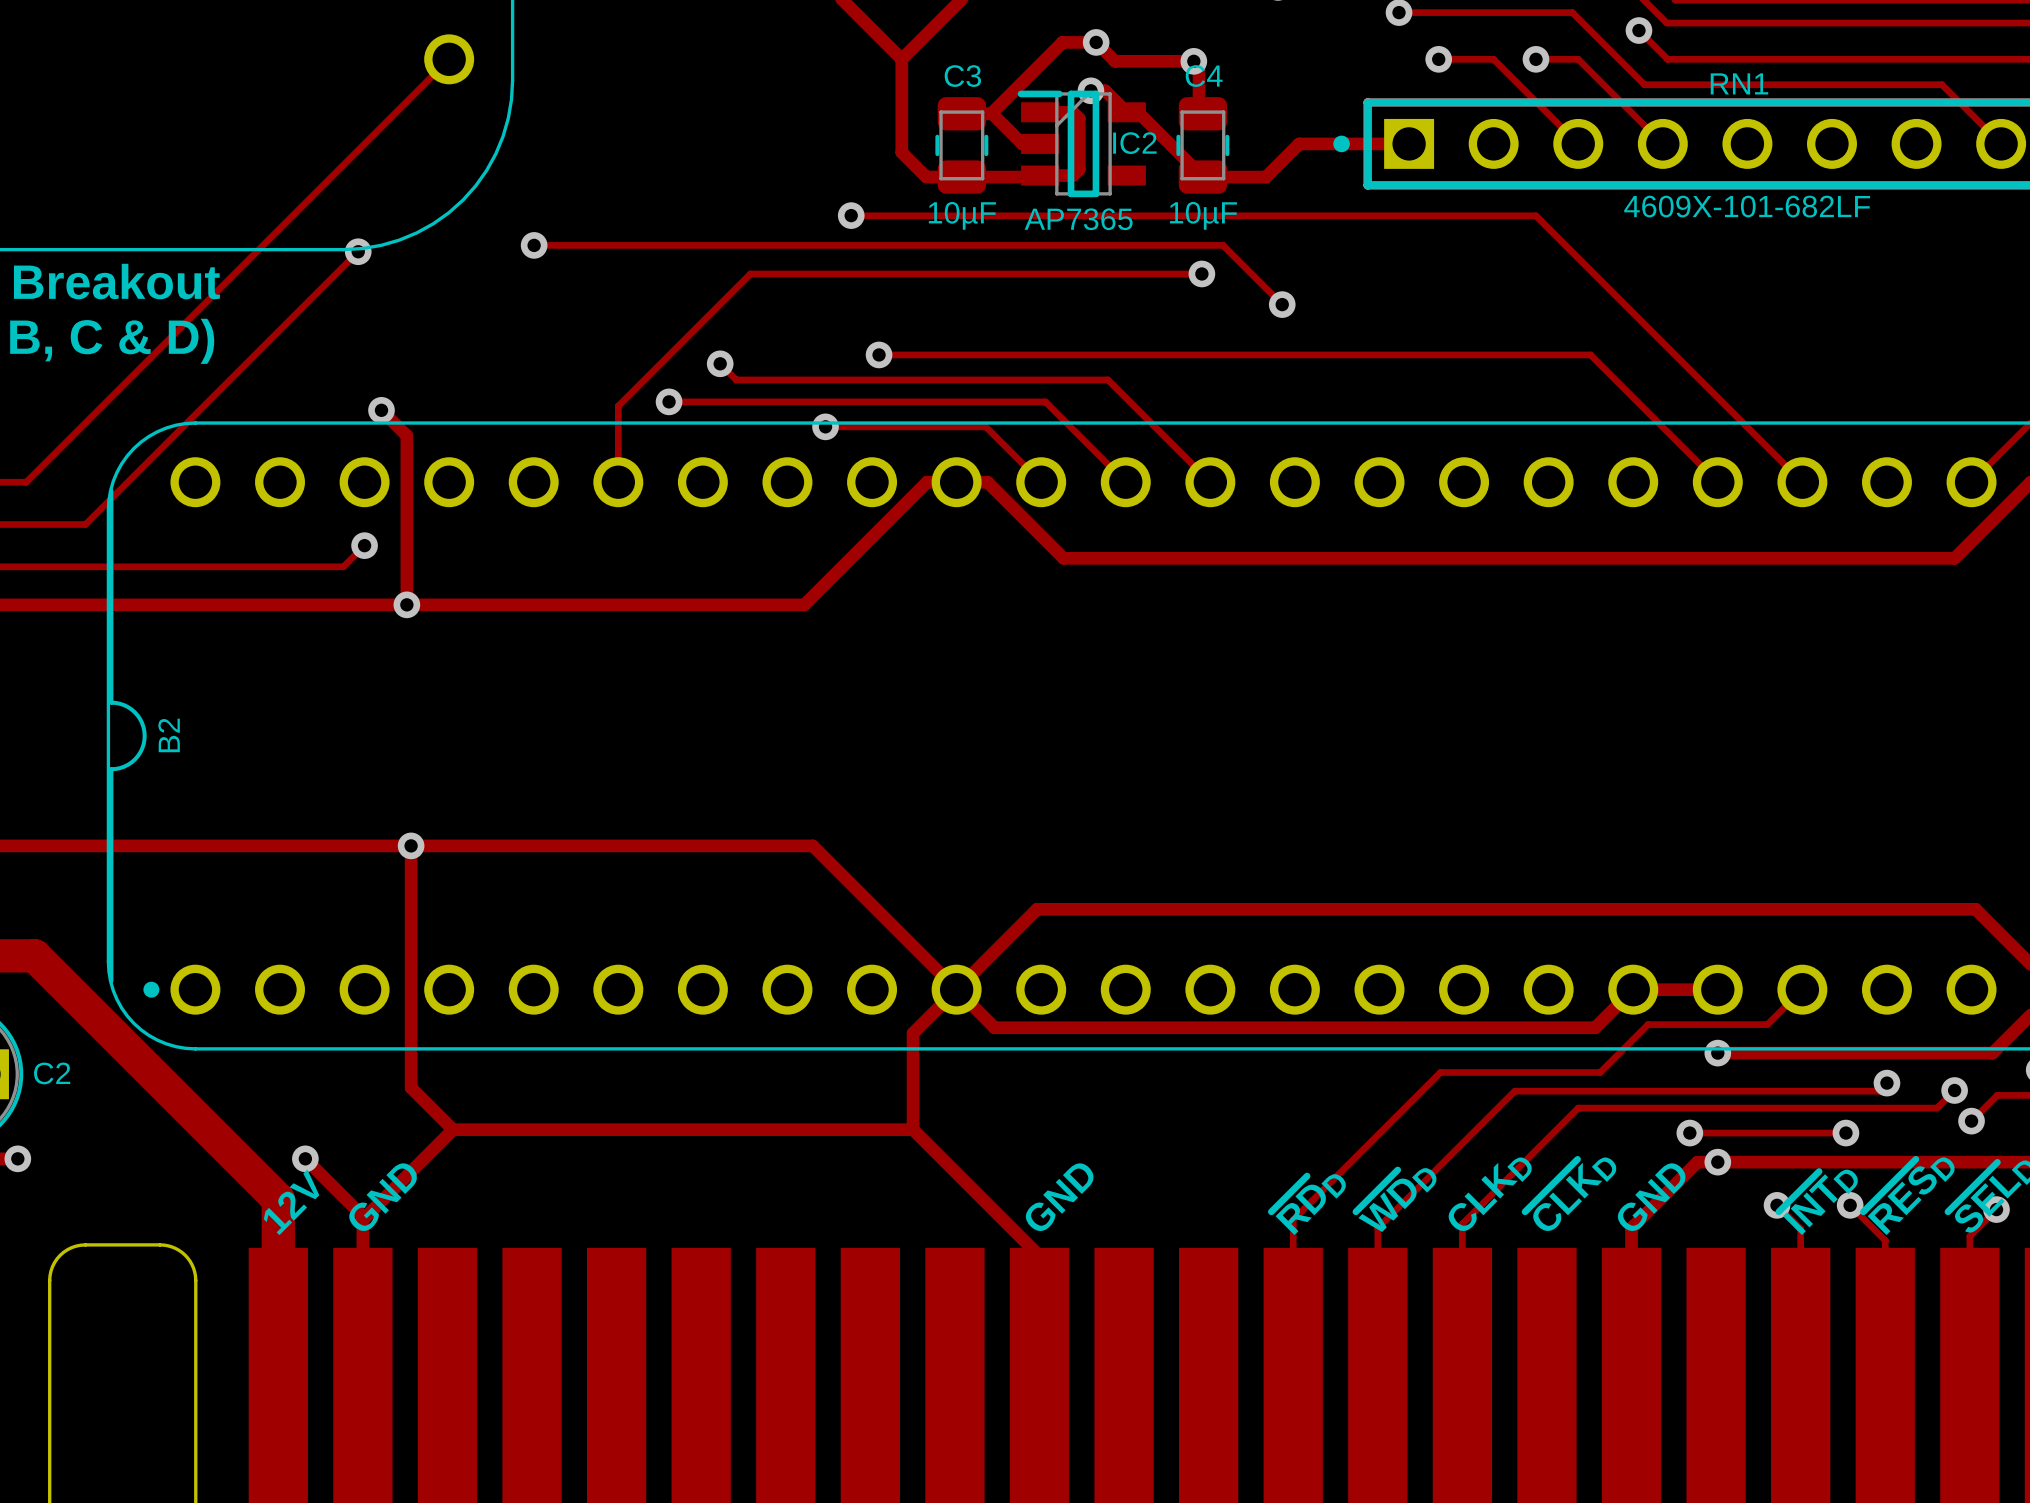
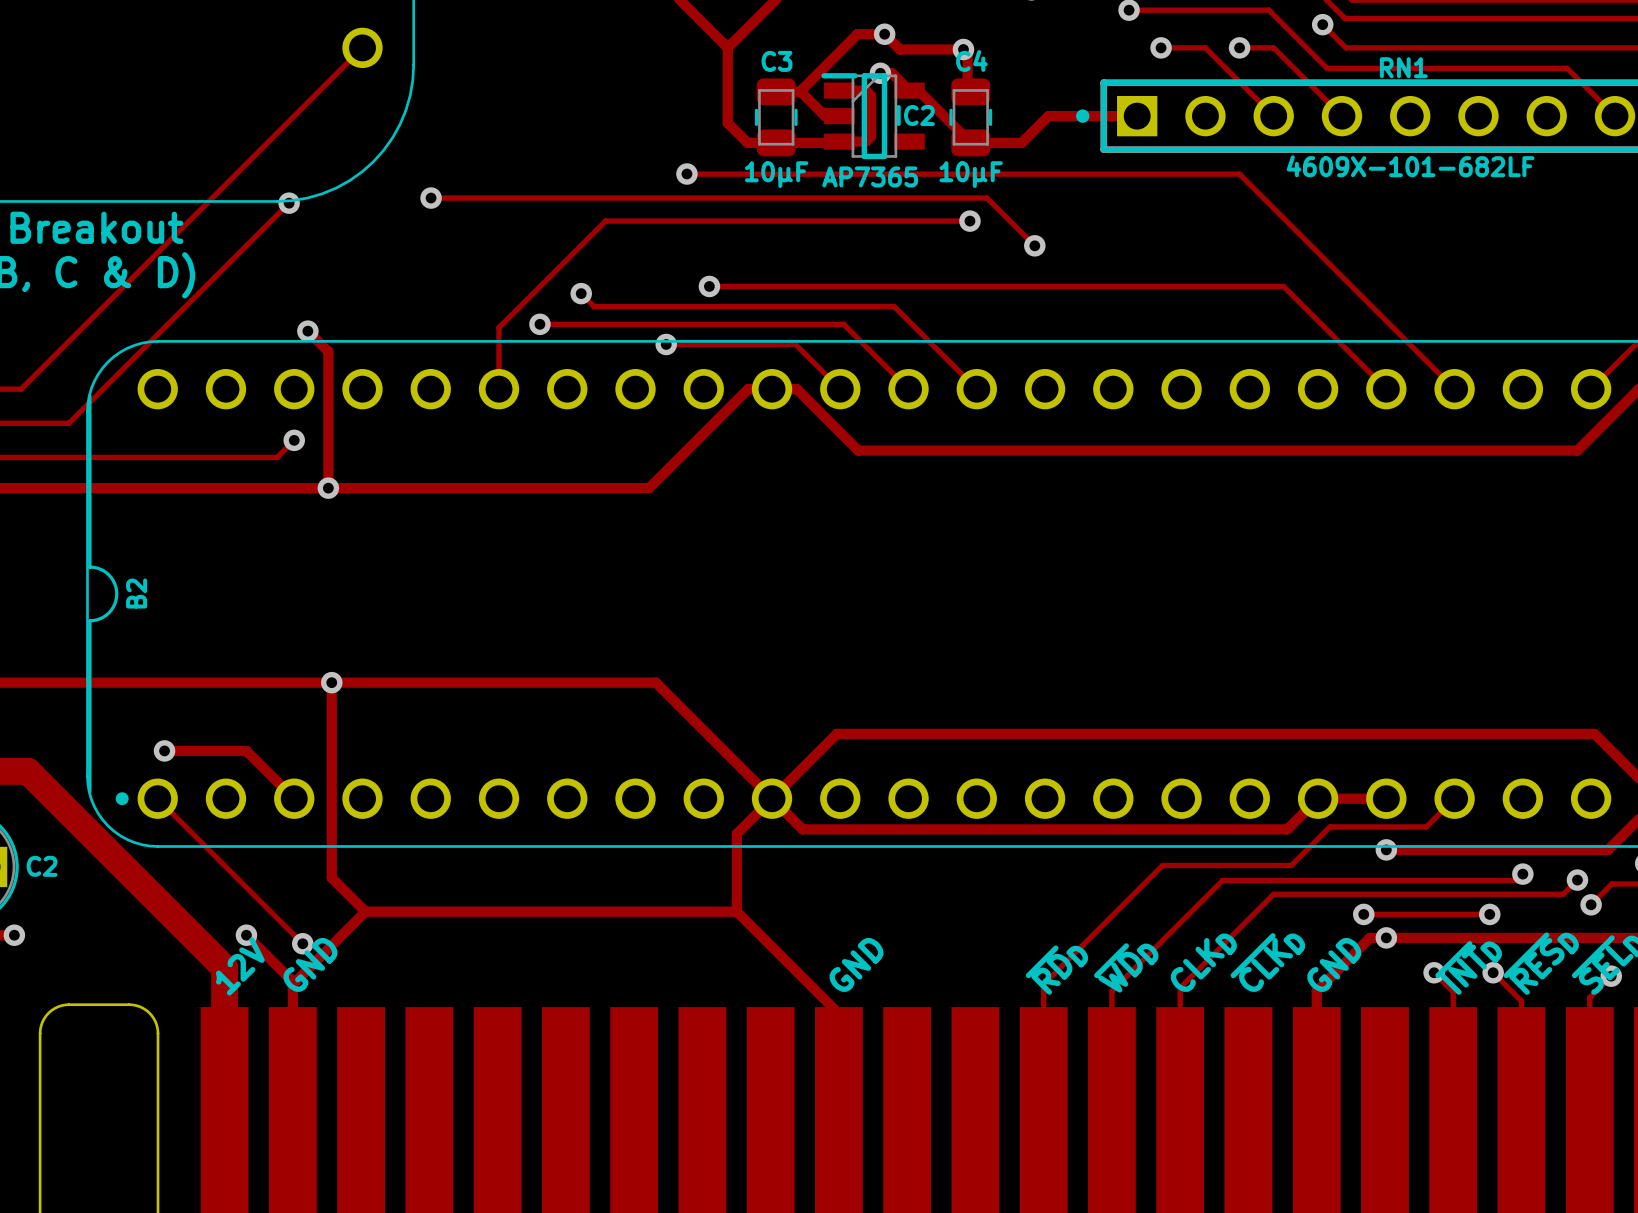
track: none -> (164, 750) (246, 750) (294, 798)
via: none -> (164, 750)
track: none -> (157, 798) (302, 943)
via: none -> (302, 943)

